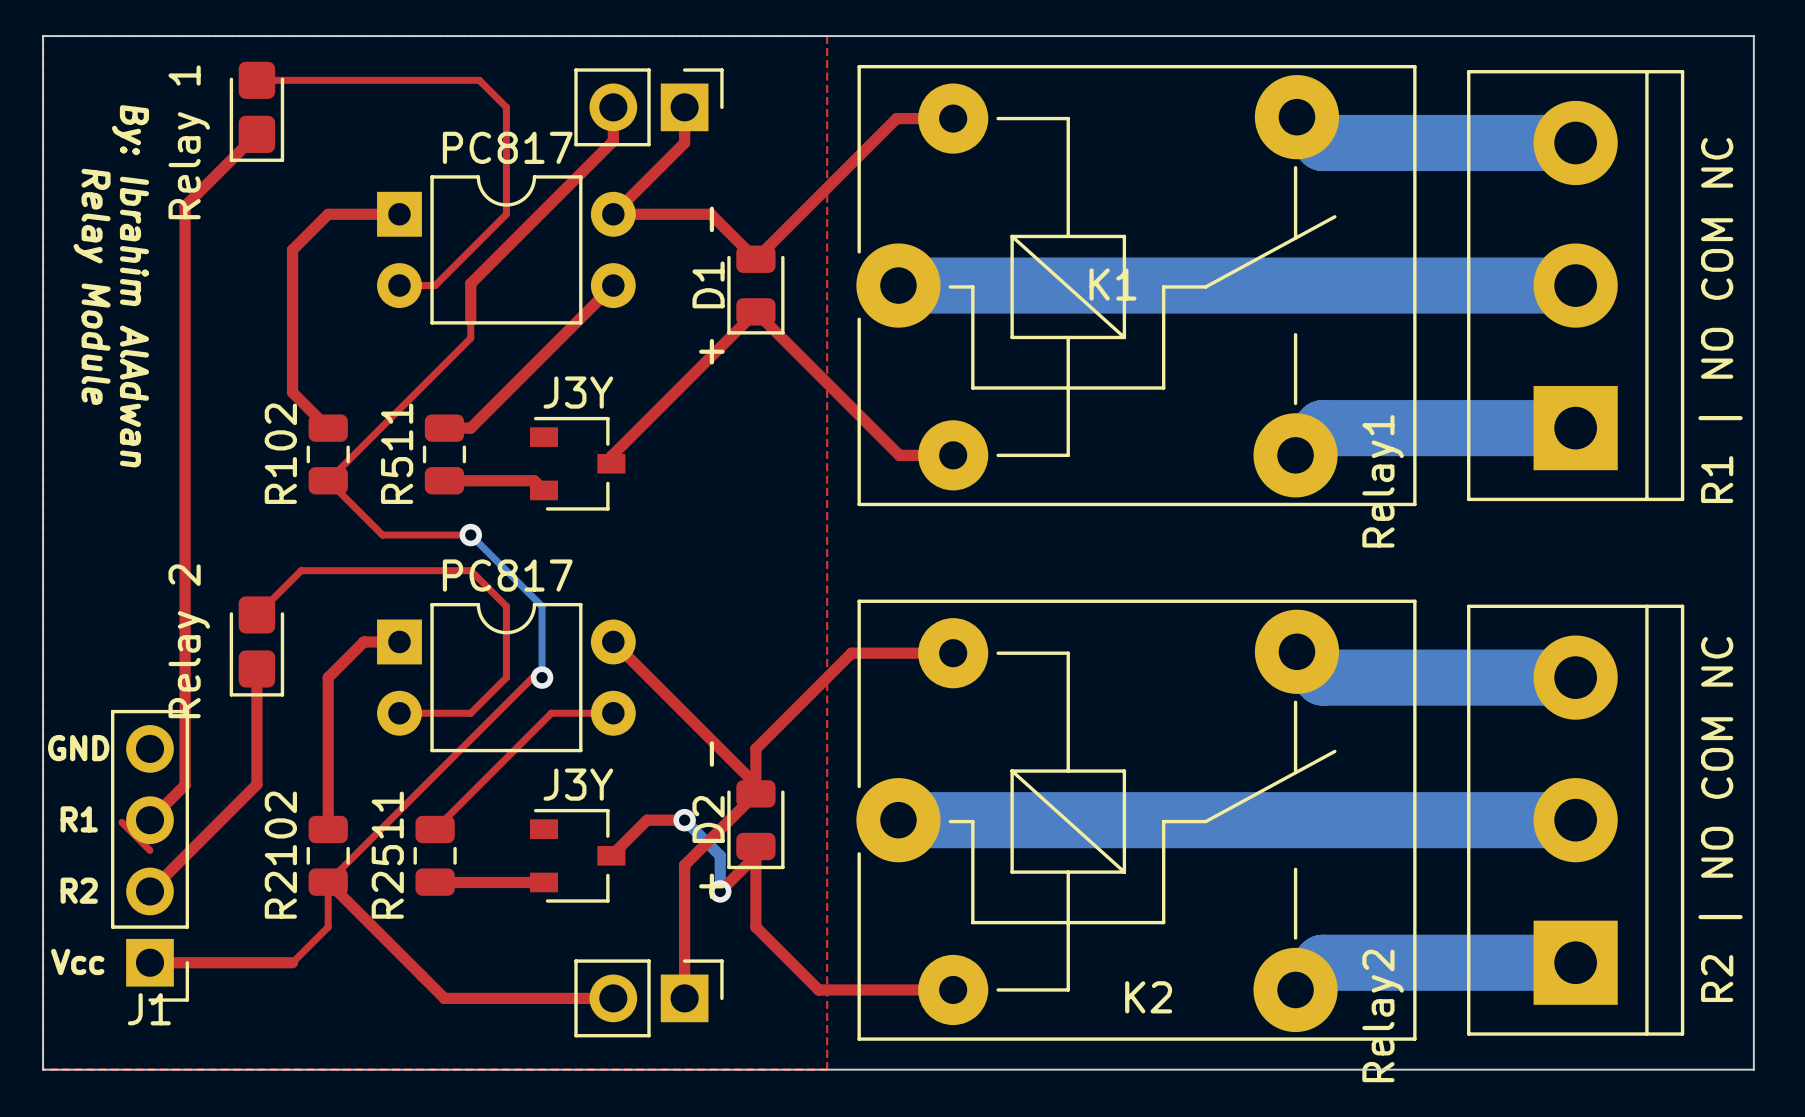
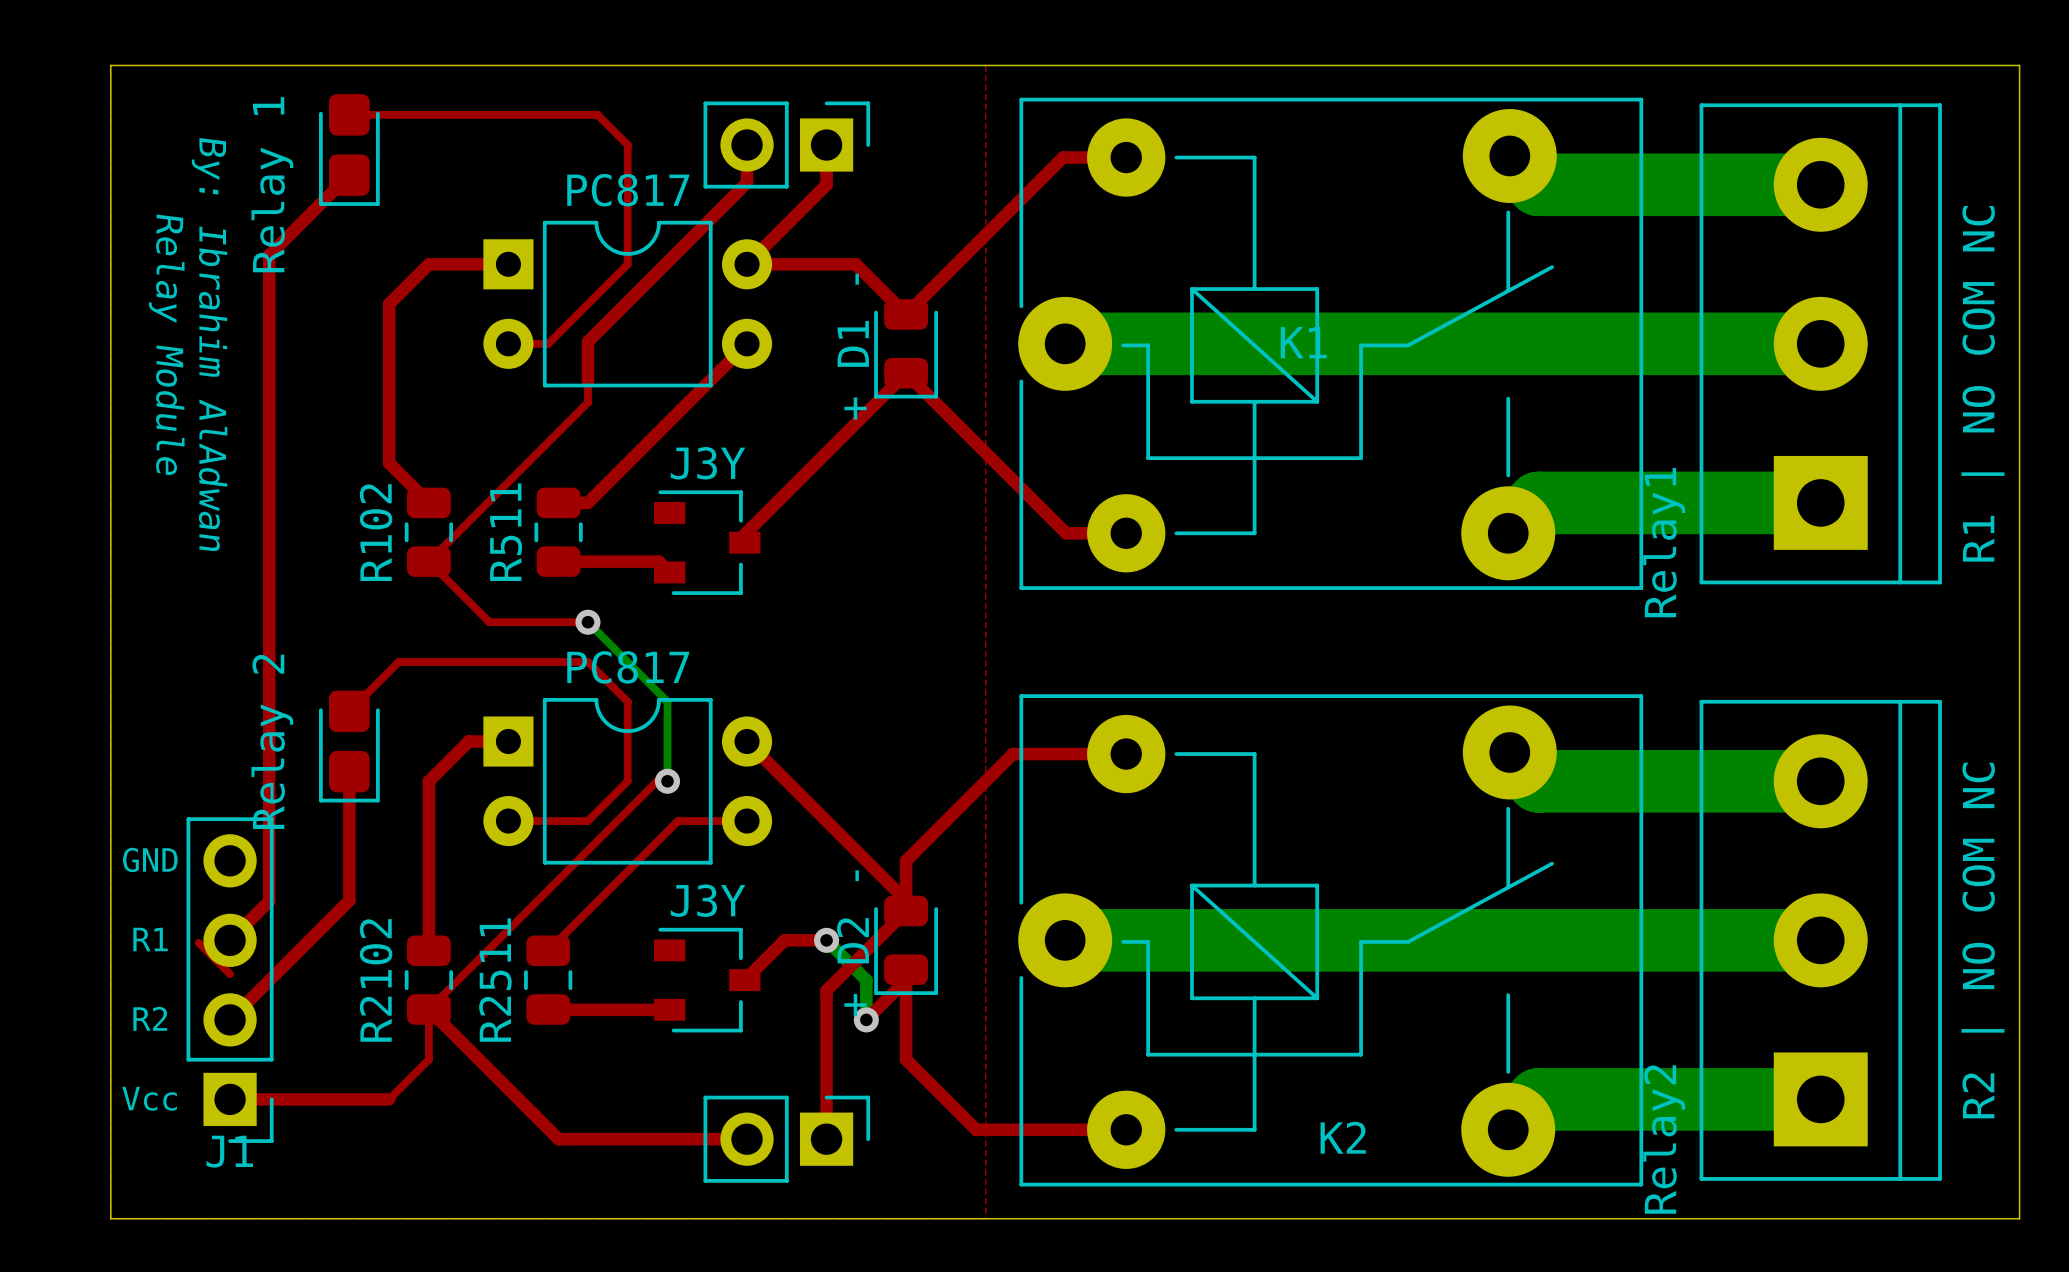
Relay1 name position: Relay1 (1383, 481) -> Relay1 (1664, 542)
Relay2 name position: Relay2 (1383, 1015) -> Relay2 (1664, 1139)

